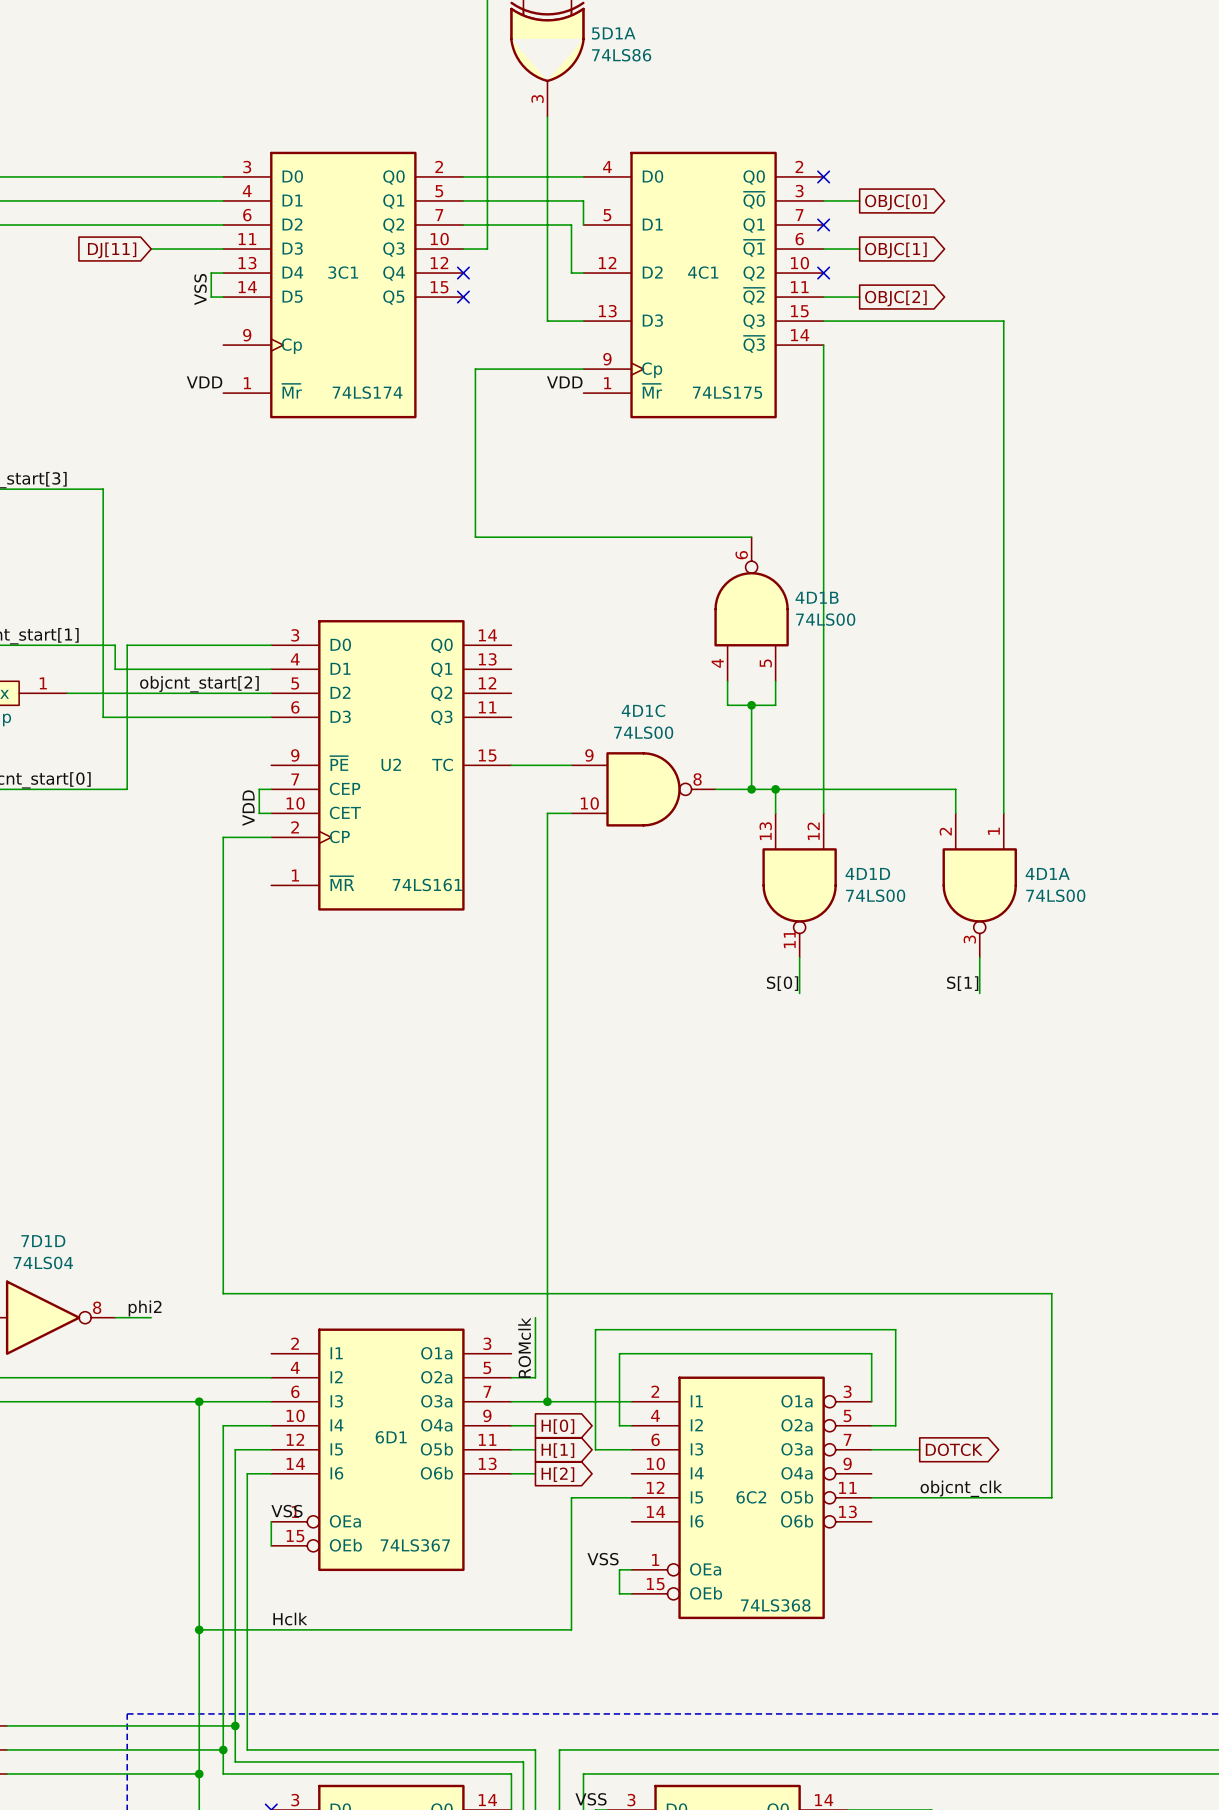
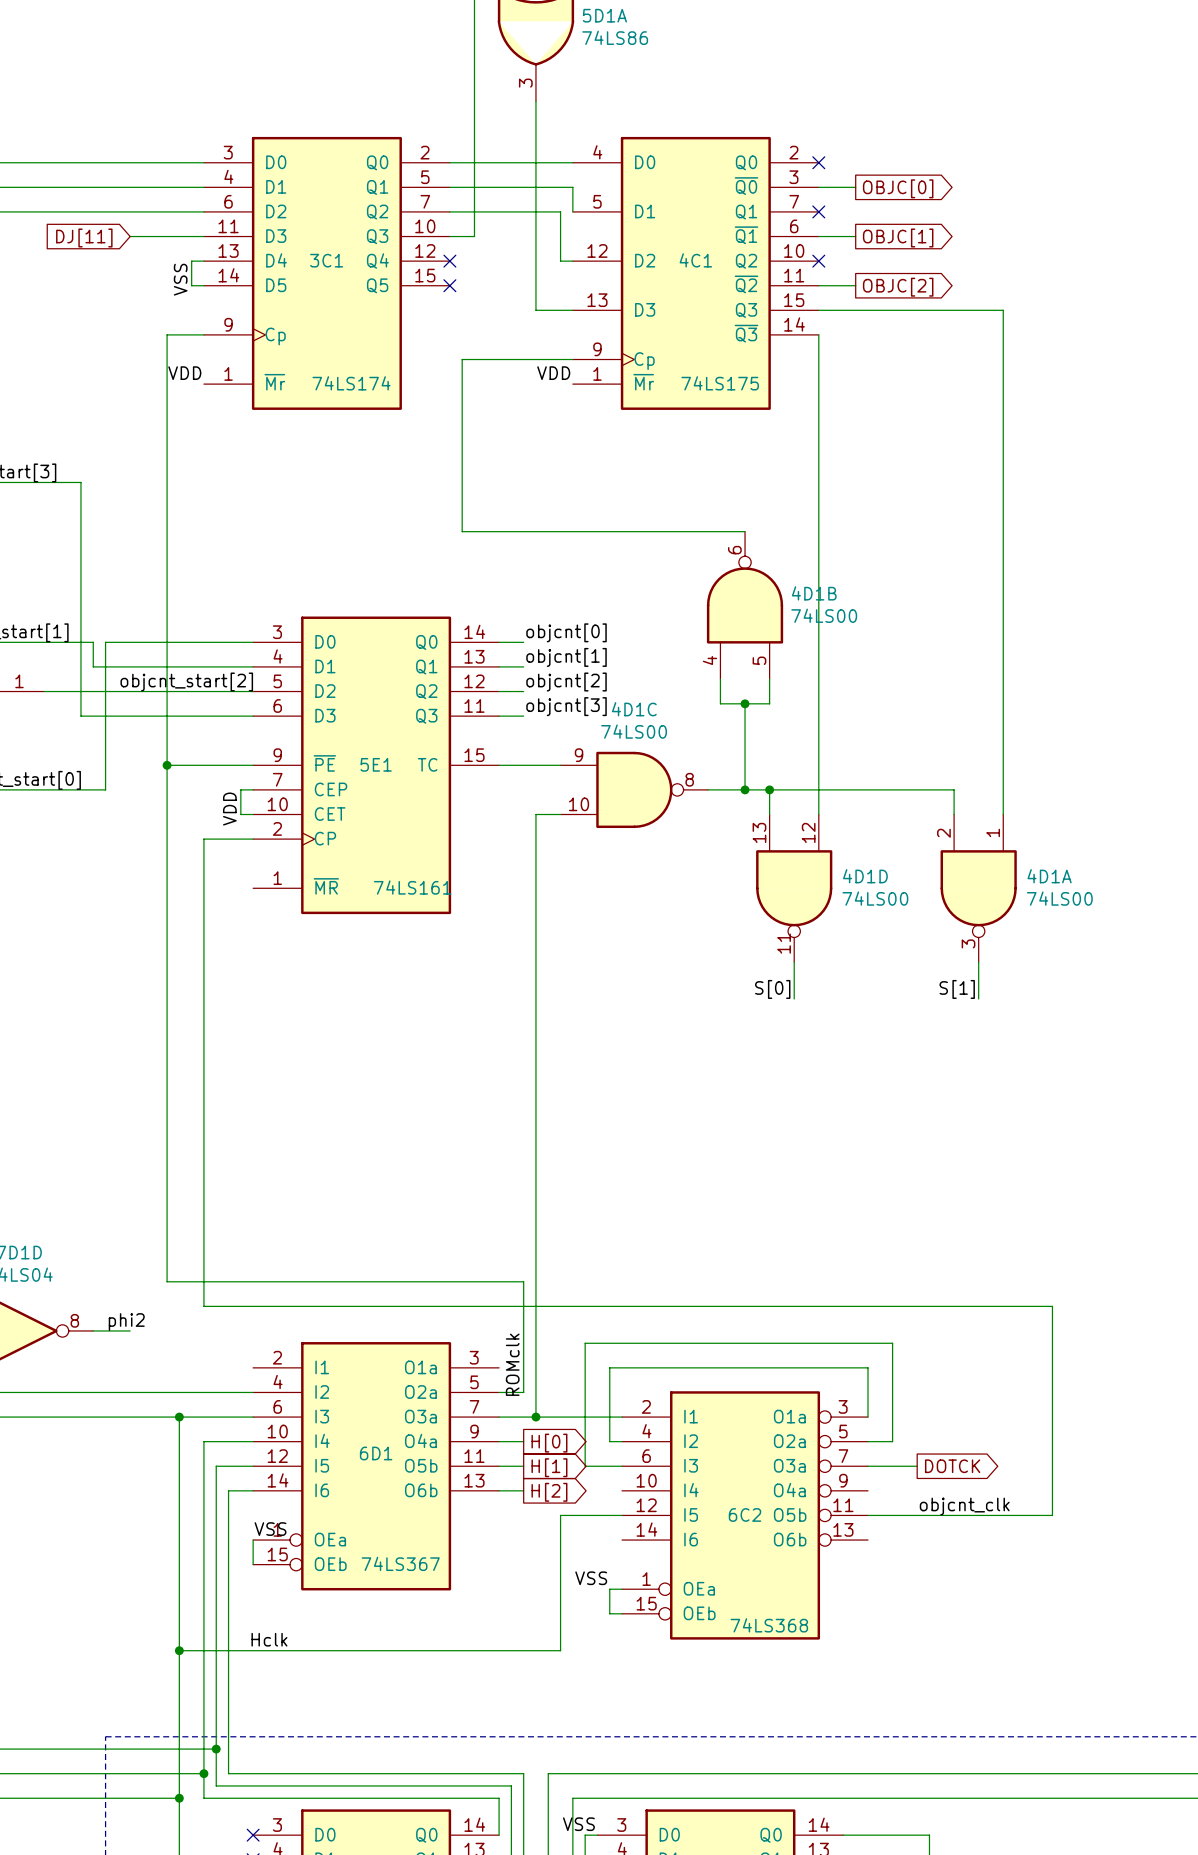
wire: none -> (203, 334) (167, 334) (167, 1281) (523, 1281) (523, 1330)
label: none -> objcnt[0] (566, 632)
wire: none -> (499, 642) (523, 642)
label: none -> objcnt[1] (566, 657)
wire: none -> (499, 666) (523, 666)
label: none -> objcnt[2] (566, 682)
wire: none -> (499, 691) (523, 691)
label: none -> objcnt[3] (566, 706)
wire: none -> (499, 716) (523, 716)
U2 name: U2 (391, 764) -> 5E1 (376, 764)
wire: none -> (167, 765) (253, 765)
junction: none -> (167, 765)

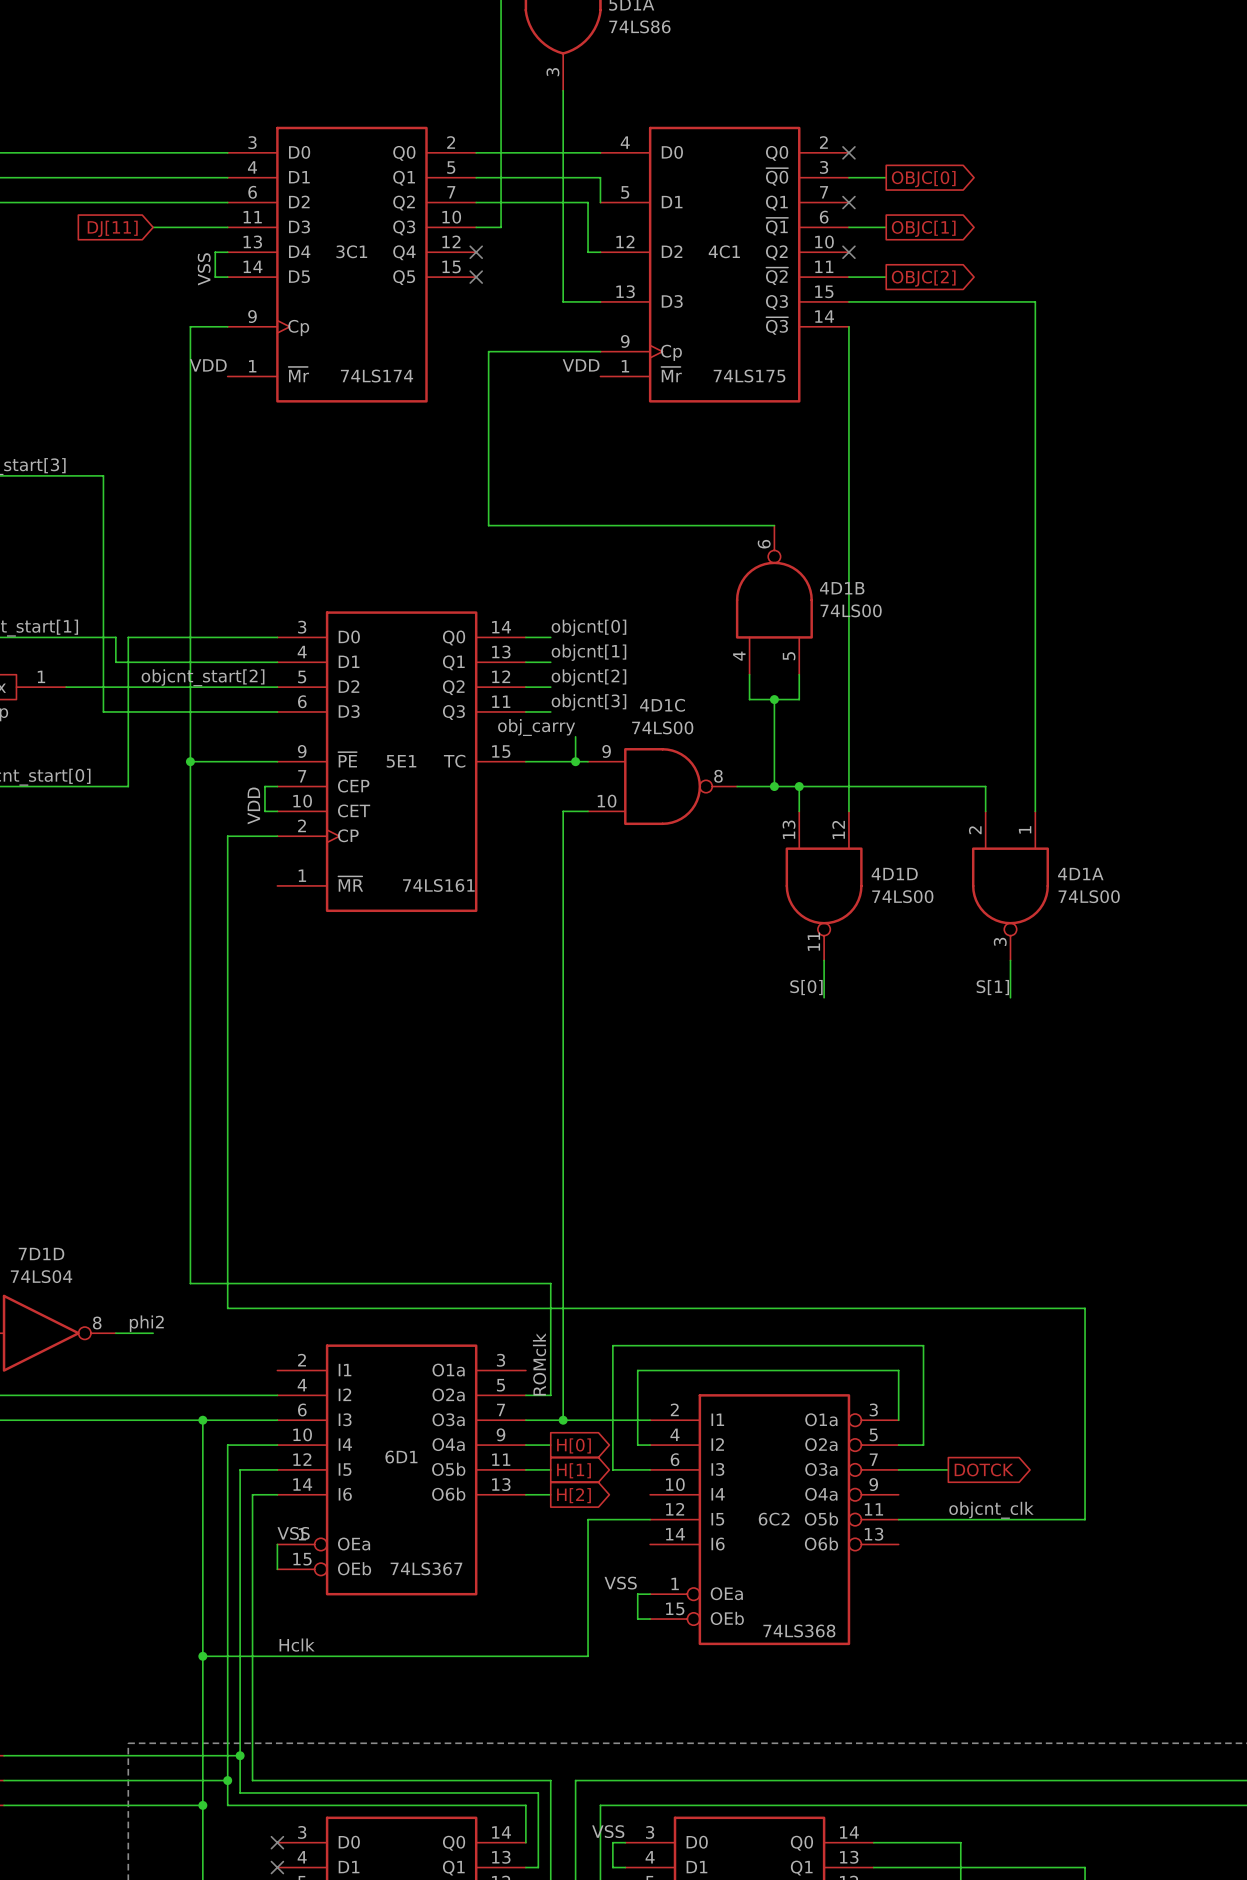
label: none -> obj_carry (536, 727)
wire: none -> (575, 736) (575, 761)
junction: none -> (575, 761)

